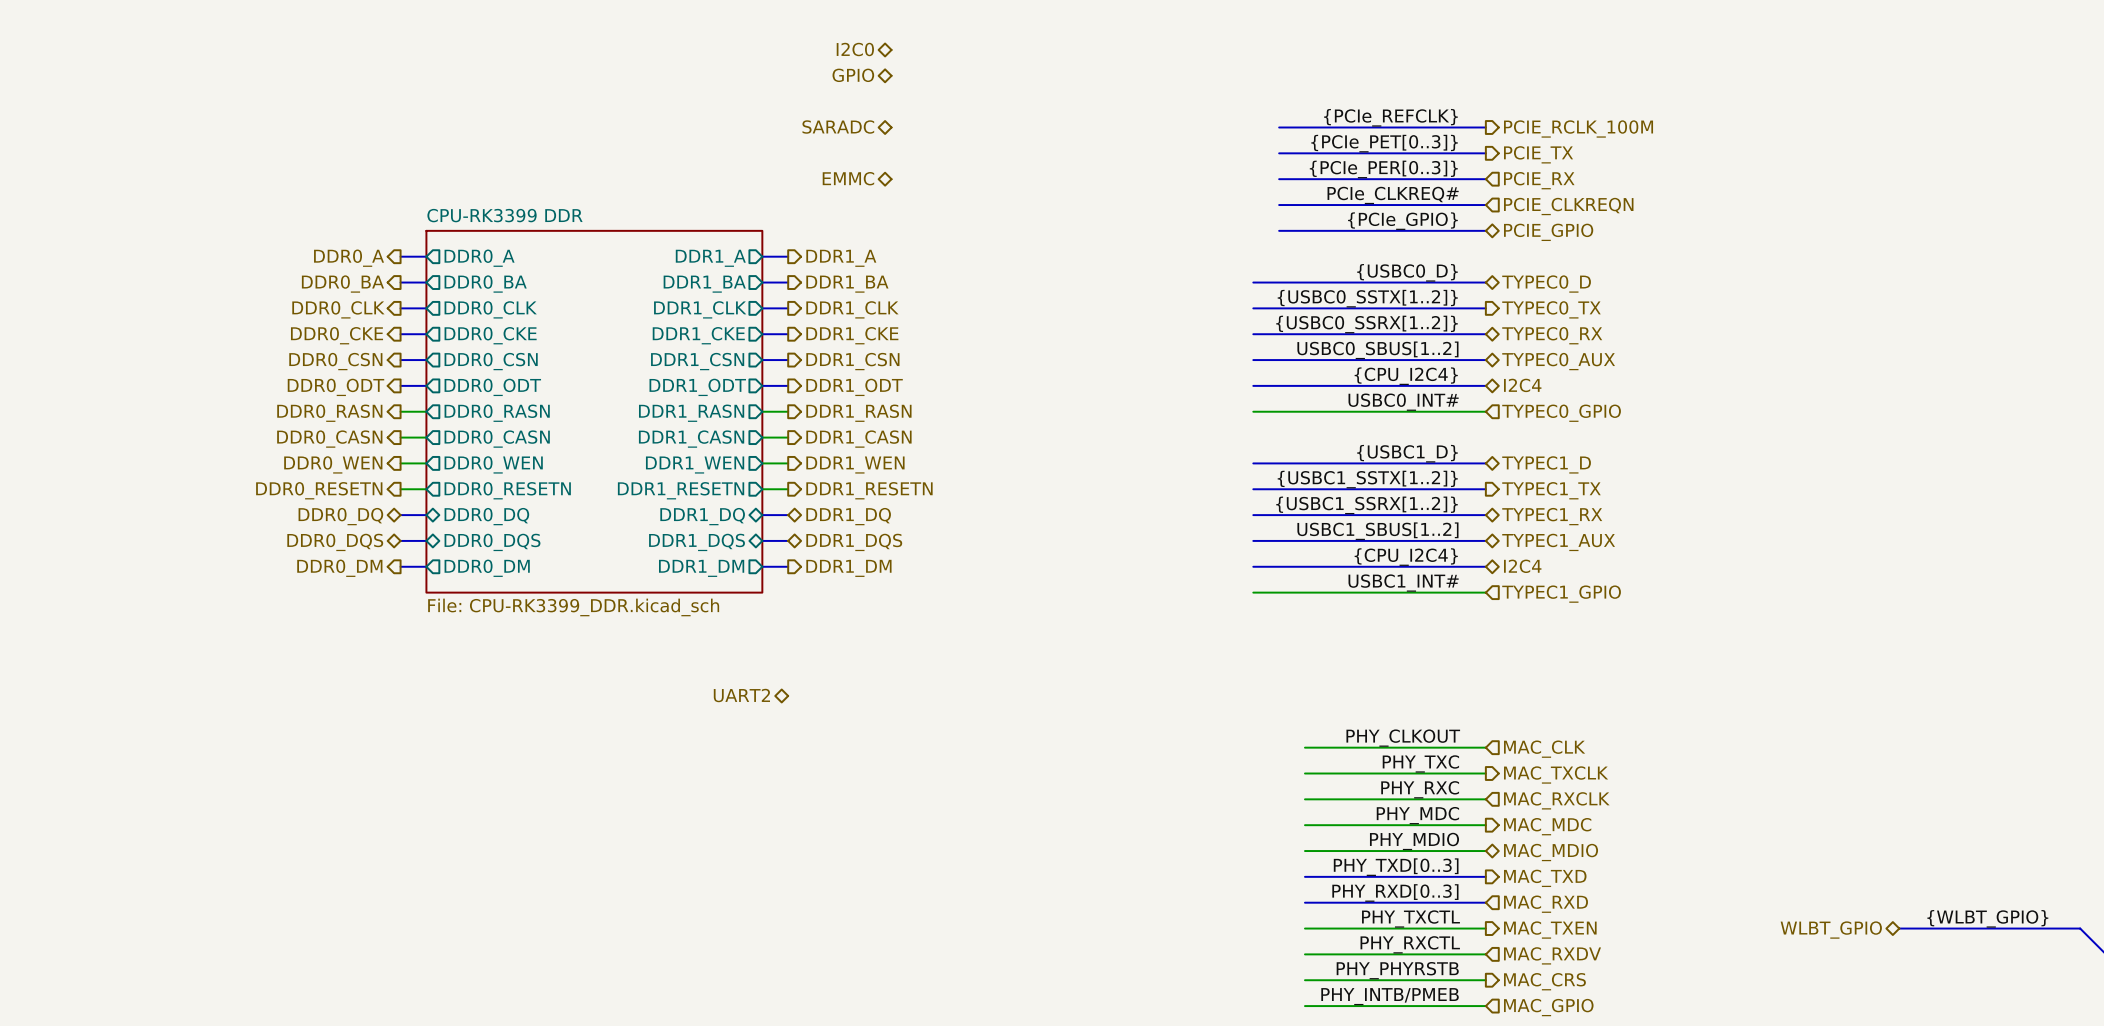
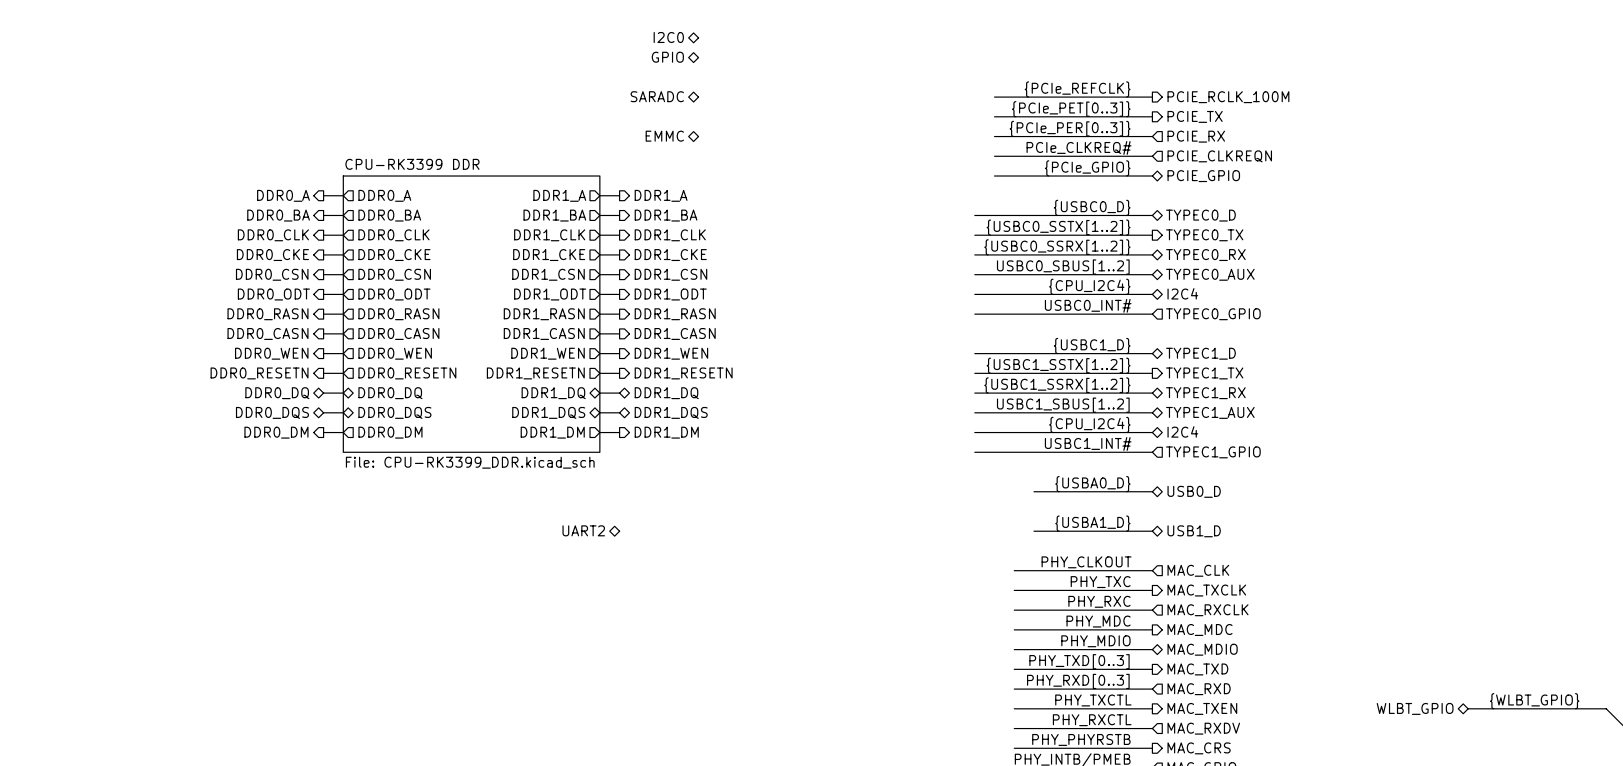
label: none -> {USBA0_D} (1092, 484)
bus: none -> (1034, 491) (1152, 491)
hierarchical label: none -> USB0_D (1194, 491)
label: none -> {USBA1_D} (1092, 523)
bus: none -> (1034, 531) (1152, 531)
hierarchical label: none -> USB1_D (1194, 531)

